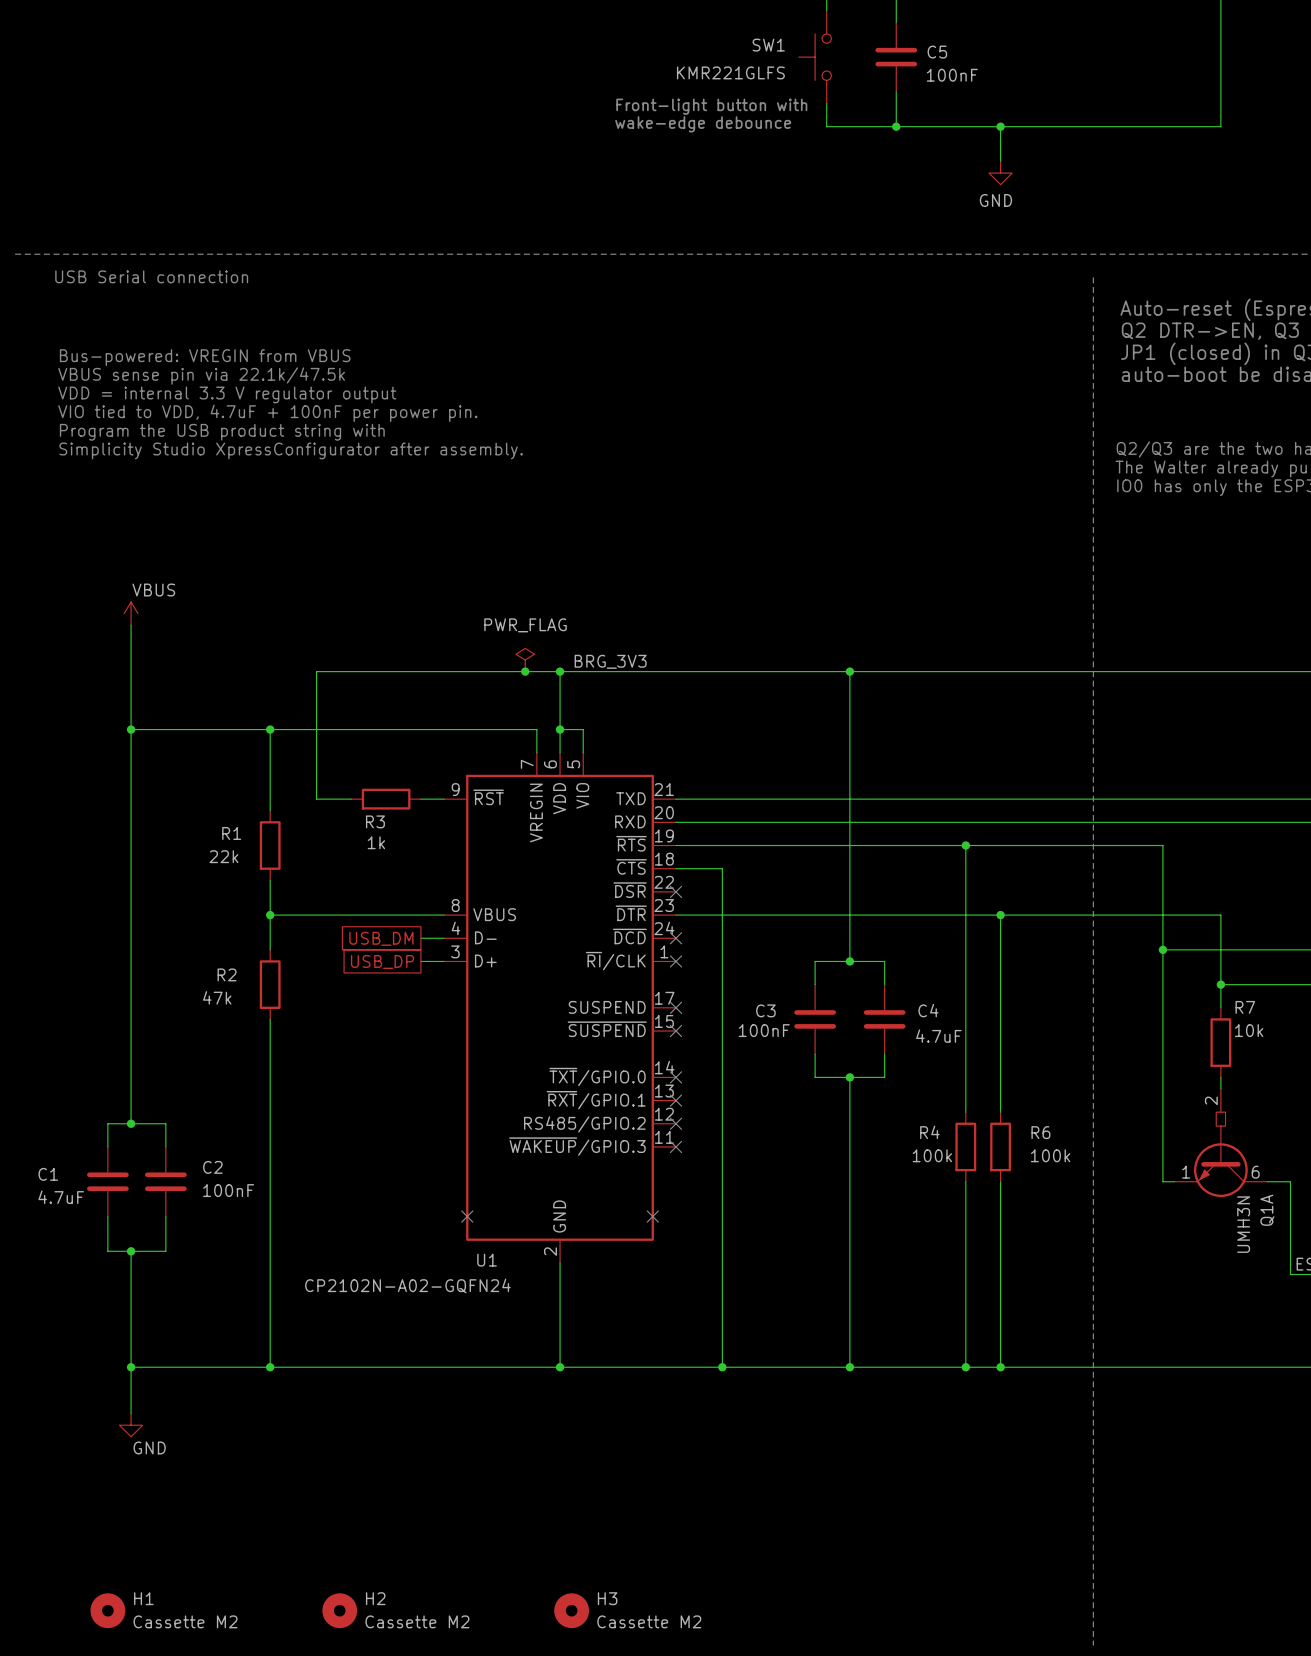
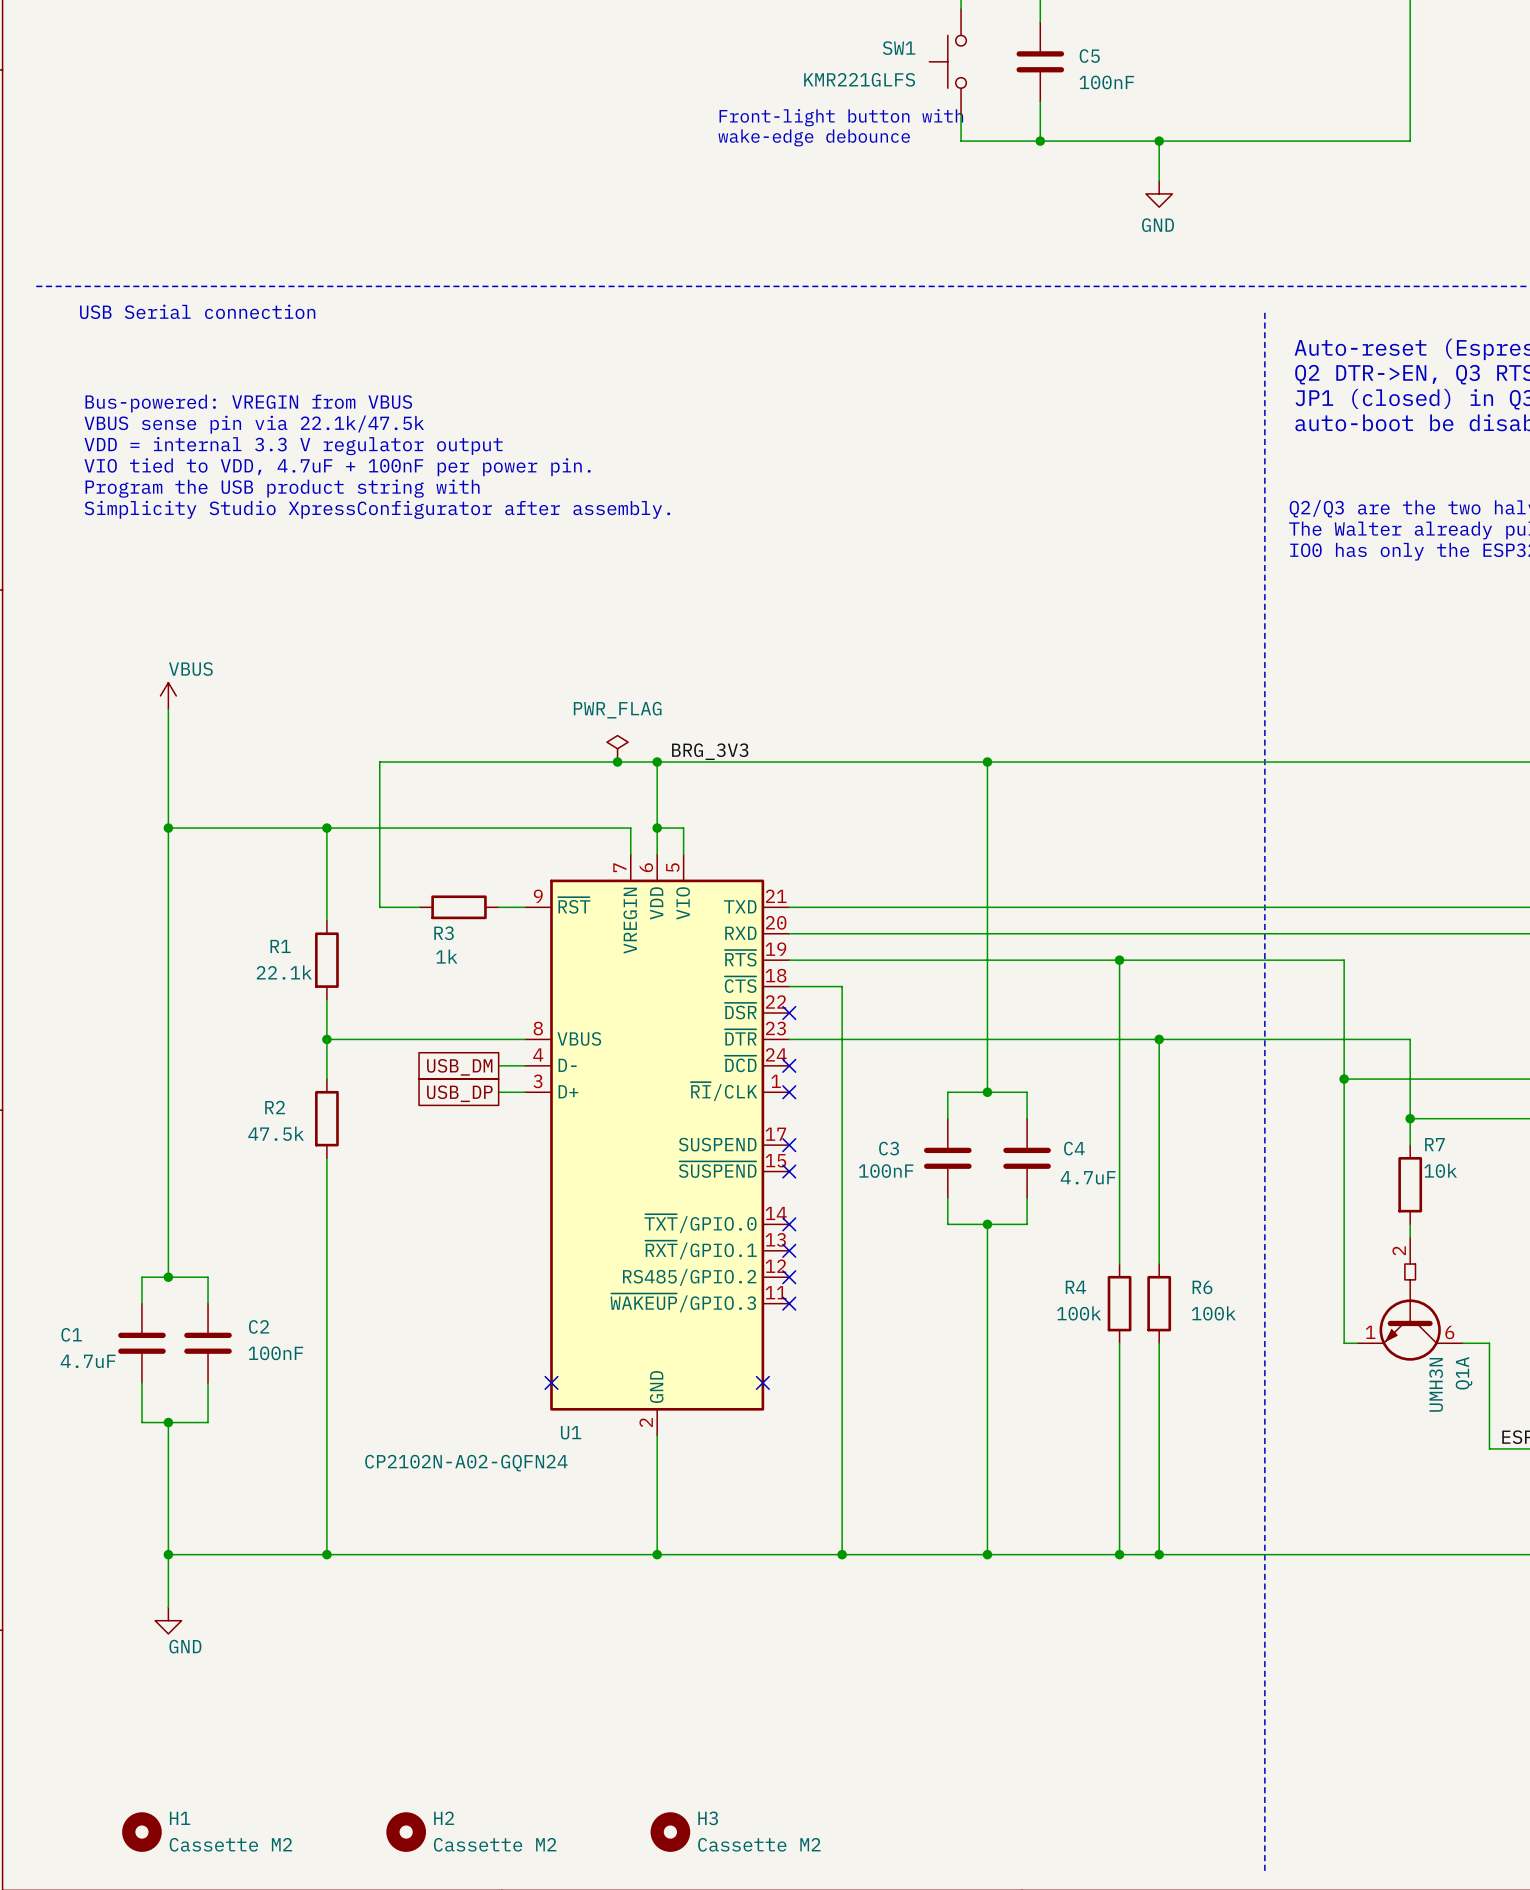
R1 value: 22k (223, 856) -> 22.1k (284, 972)
R2 value: 47k (217, 997) -> 47.5k (276, 1133)

